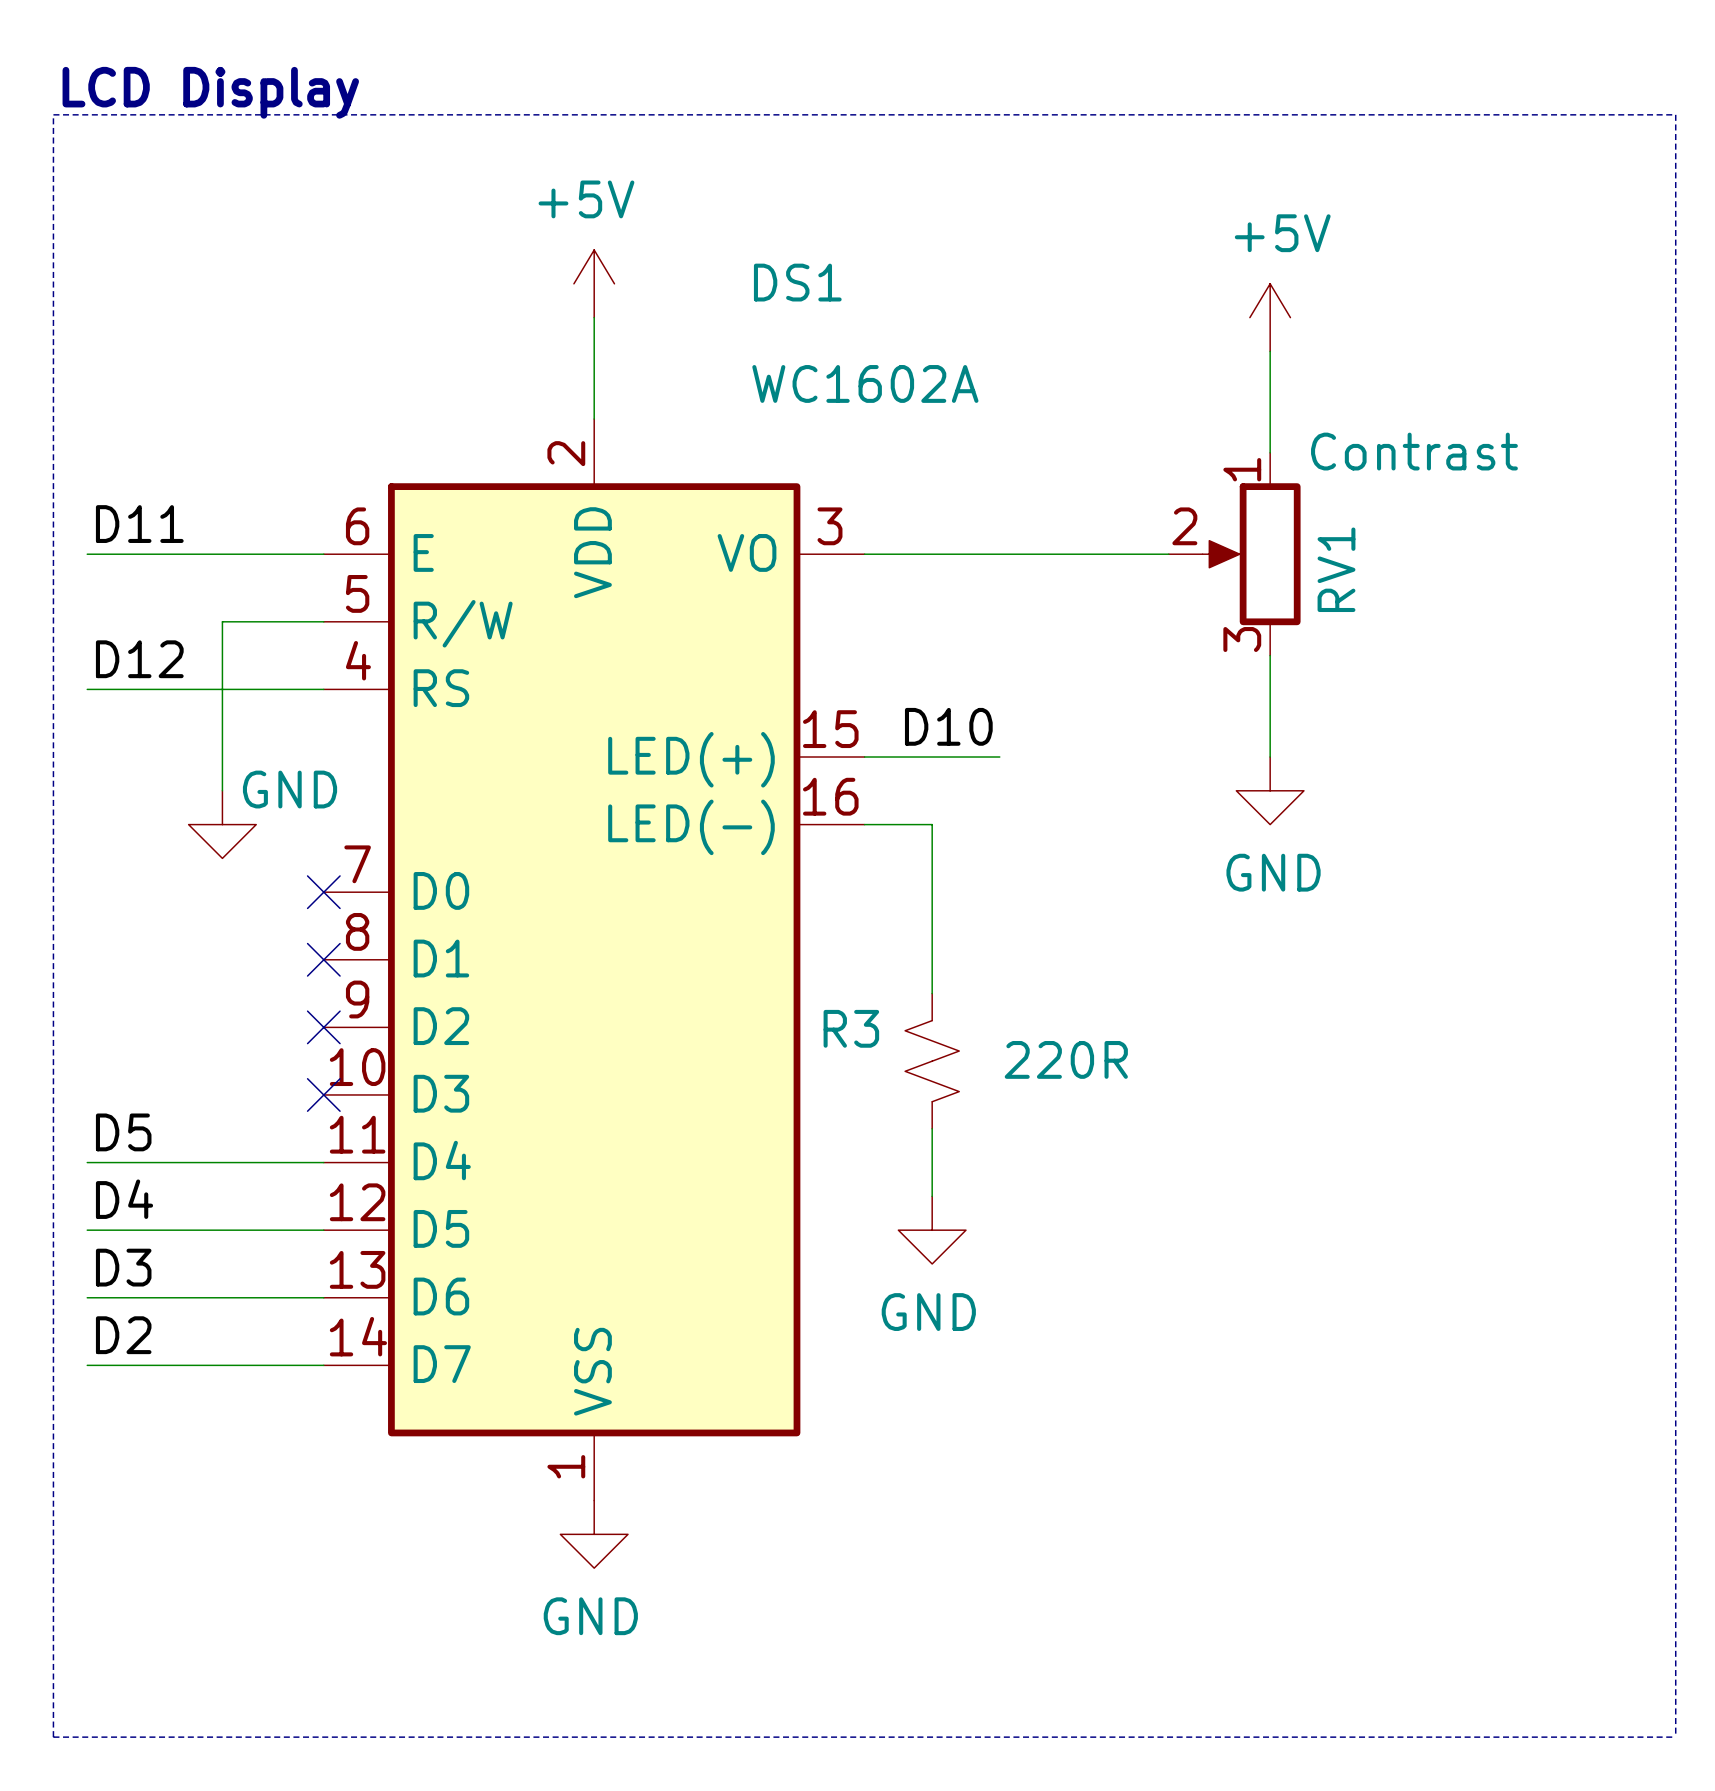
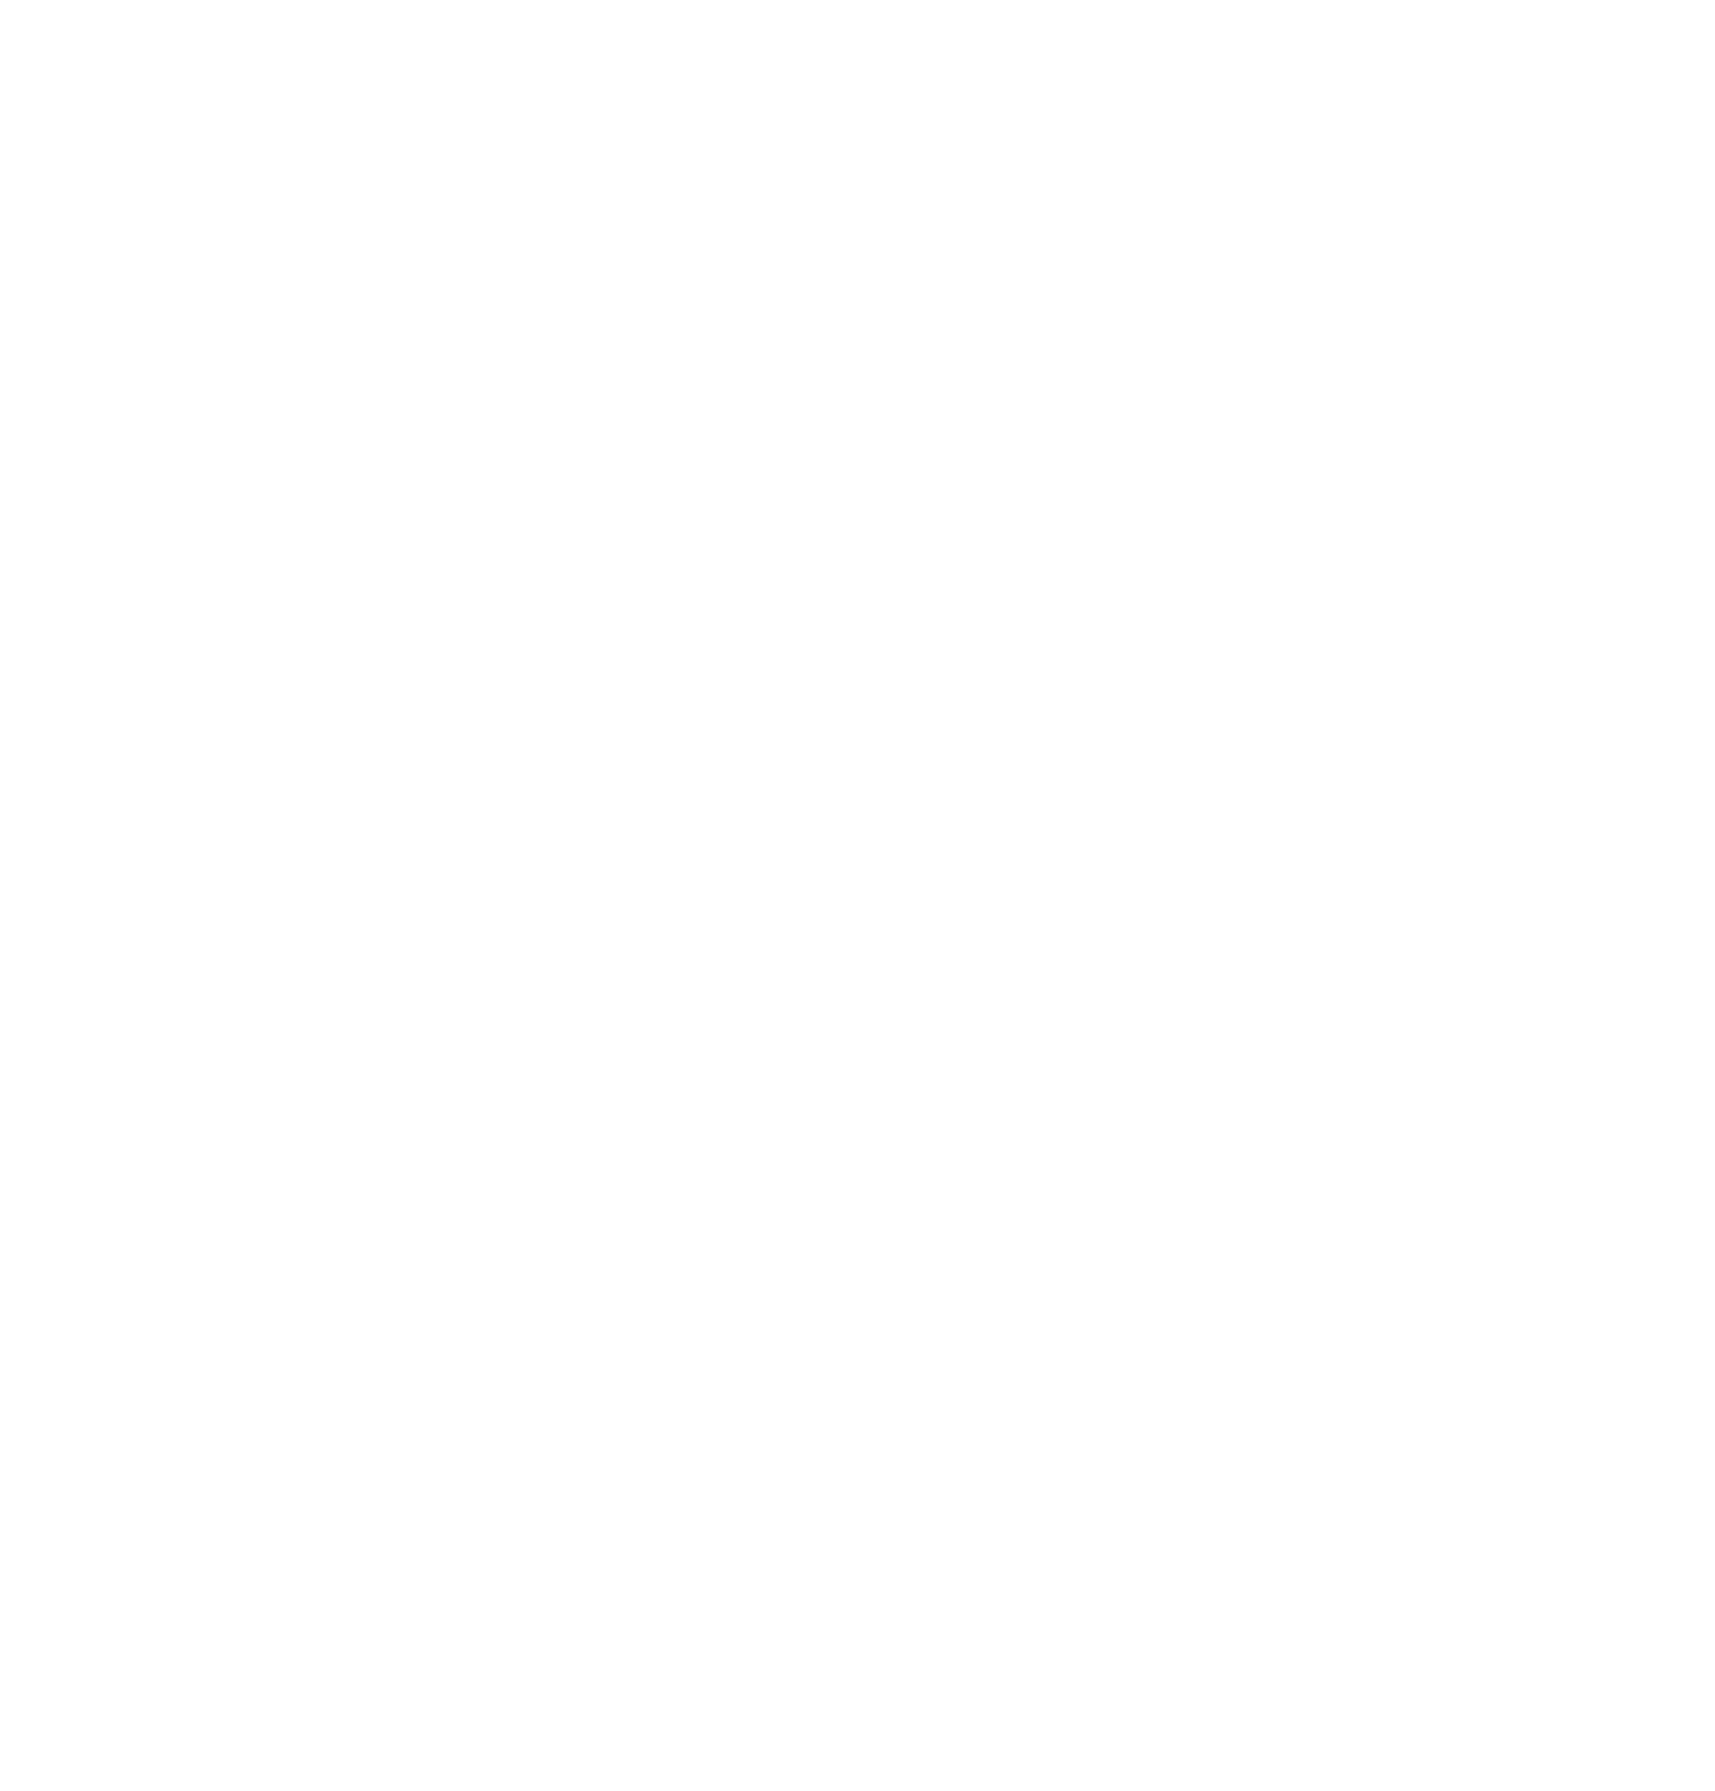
text: LCD Display (210, 92) -> none
line: (53, 114) (53, 1737) (1675, 1737) (1675, 114) (53, 114) -> none
power symbol: +5V (594, 283) -> none
wire: (594, 317) (594, 419) -> none
power symbol: +5V (1270, 317) -> none
wire: (1270, 351) (1270, 452) -> none
label: D11 (139, 524) -> none
wire: (87, 554) (323, 554) -> none
wire: (864, 554) (1168, 554) -> none
RV1: Contrast (1234, 554) -> none
wire: (323, 621) (222, 621) (222, 790) -> none
wire: (1270, 655) (1270, 757) -> none
label: D12 (139, 659) -> none
wire: (87, 689) (323, 689) -> none
label: D10 (948, 726) -> none
wire: (864, 757) (999, 757) -> none
power symbol: GND (1270, 790) -> none
power symbol: GND (222, 824) -> none
wire: (864, 824) (932, 824) (932, 993) -> none
no-connect mark: (323, 892) -> none
no-connect mark: (323, 959) -> none
DS1: WC1602A (594, 959) -> none
no-connect mark: (323, 1027) -> none
R3: 220R (932, 1061) -> none
no-connect mark: (323, 1094) -> none
wire: (932, 1128) (932, 1196) -> none
label: D5 (123, 1132) -> none
wire: (87, 1162) (323, 1162) -> none
label: D4 (124, 1199) -> none
wire: (87, 1230) (323, 1230) -> none
power symbol: GND (932, 1230) -> none
label: D3 (123, 1267) -> none
wire: (87, 1297) (323, 1297) -> none
label: D2 (123, 1335) -> none
wire: (87, 1365) (323, 1365) -> none
power symbol: GND (594, 1534) -> none

